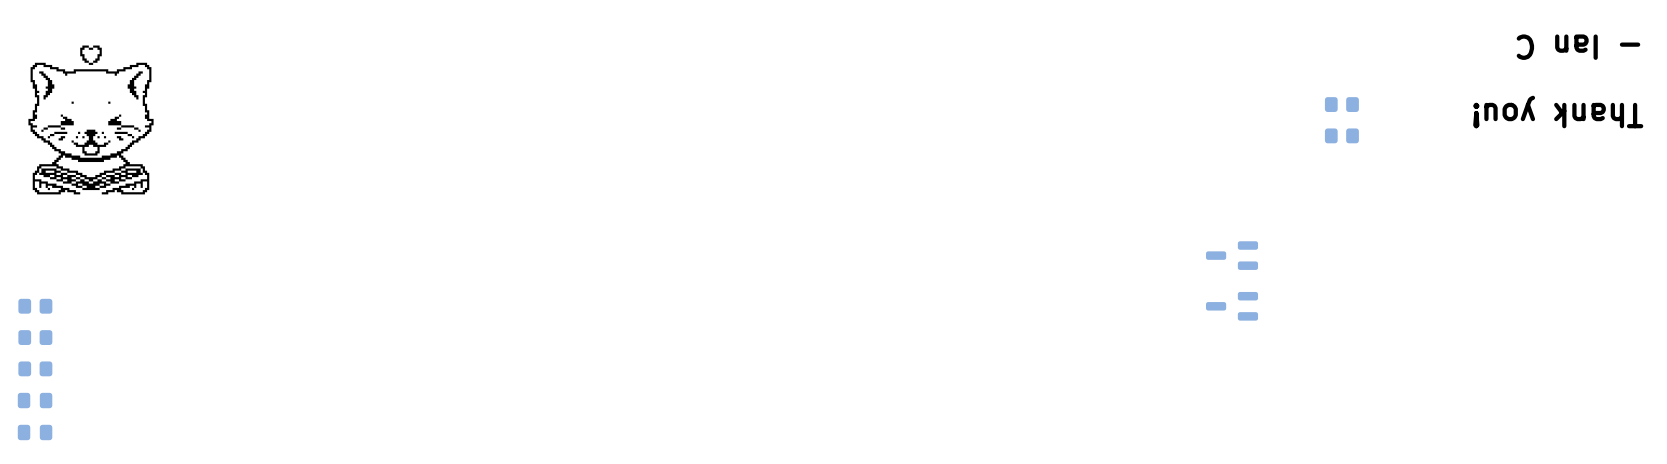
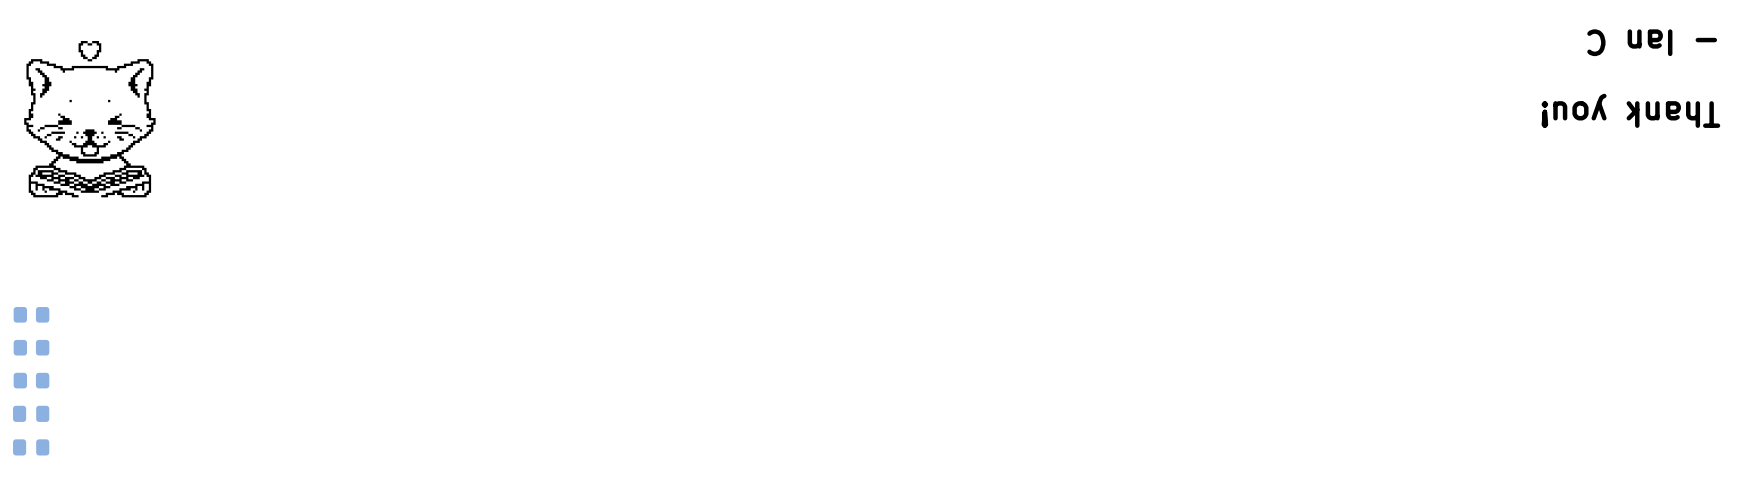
part: (1341, 104) -> none
part: (1341, 135) -> none
part: (1232, 255) -> none
part: (1232, 306) -> none

